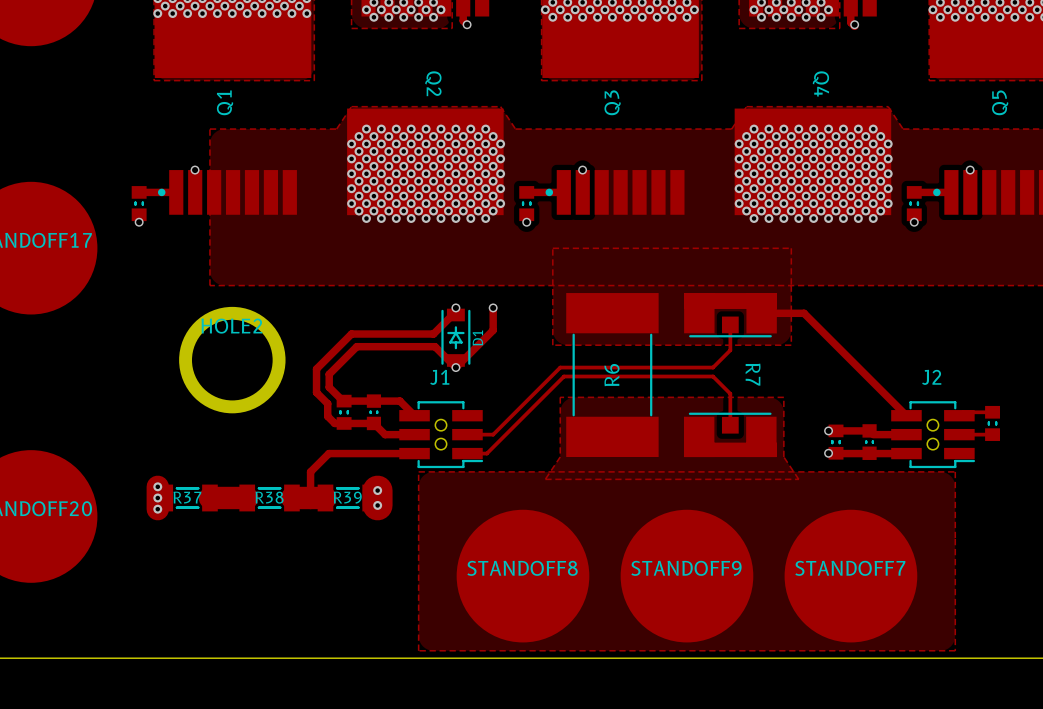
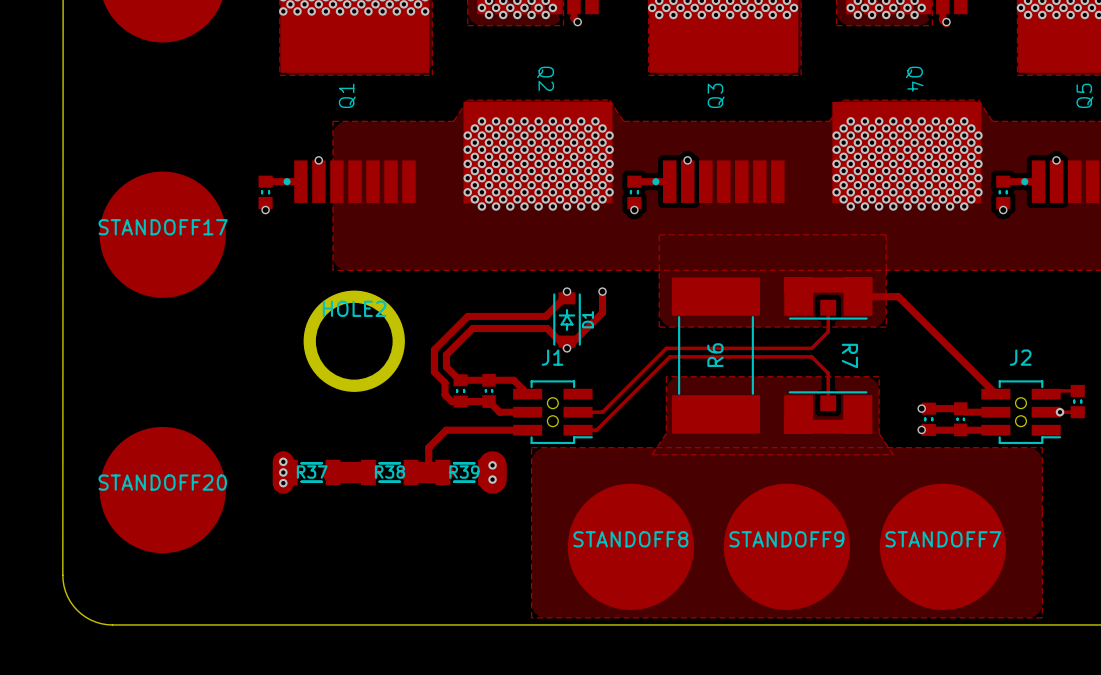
via: none -> (1060, 412)

